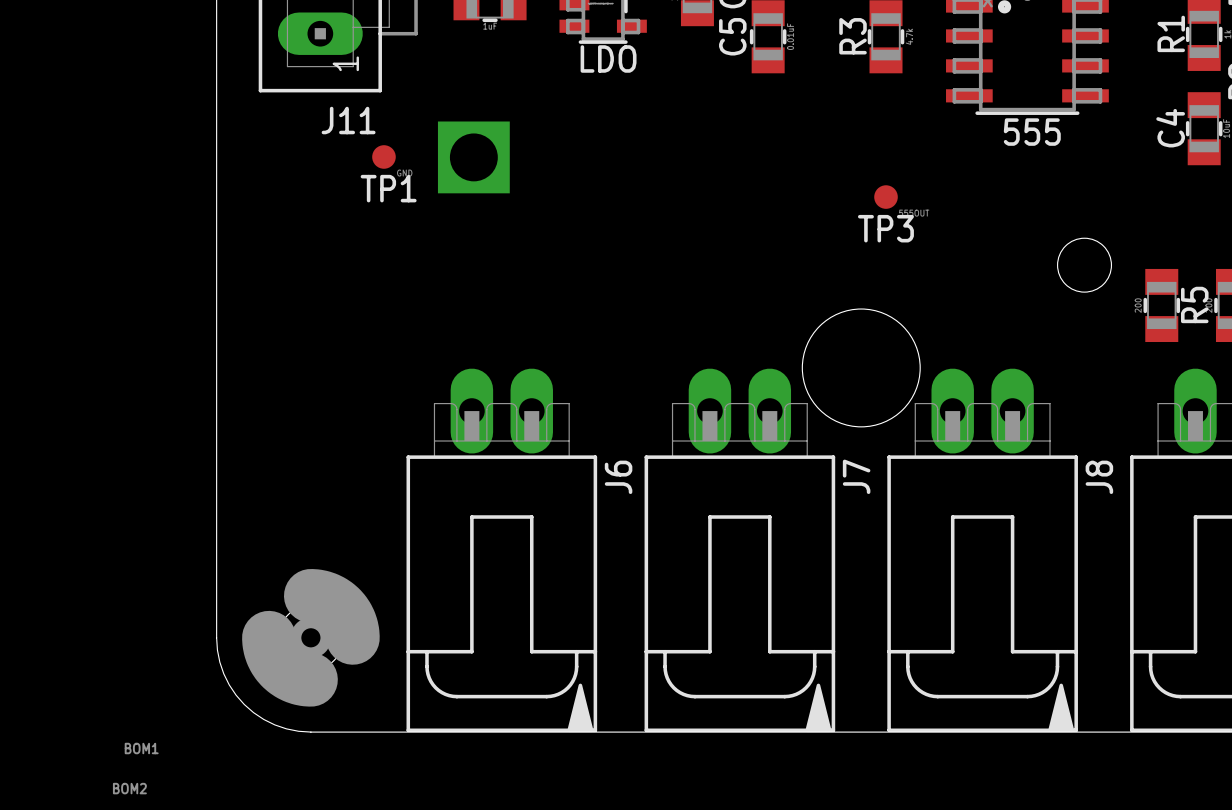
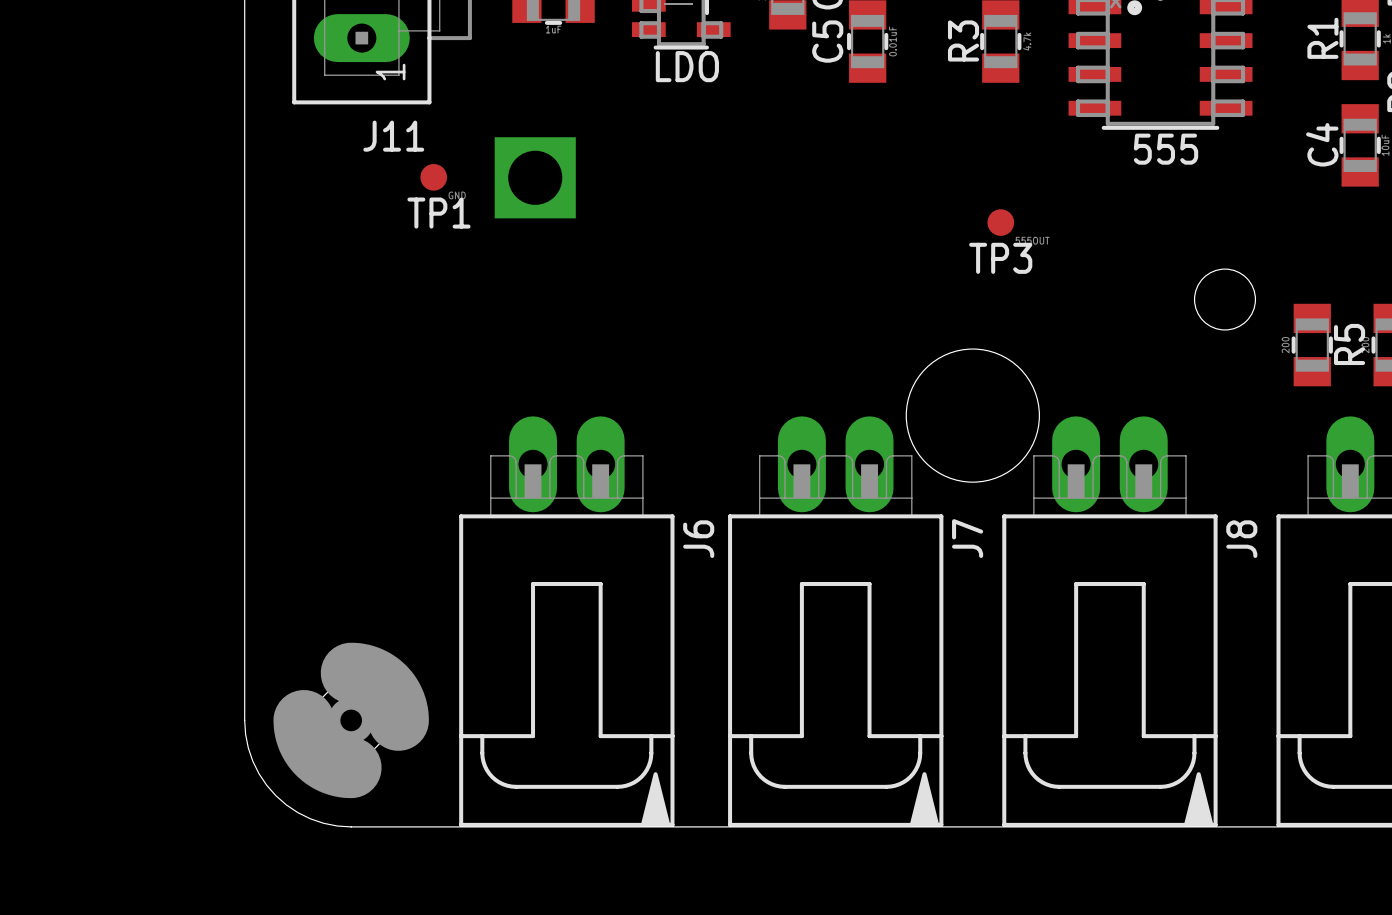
BOM1: (141, 748) -> none
BOM2: (129, 788) -> none

